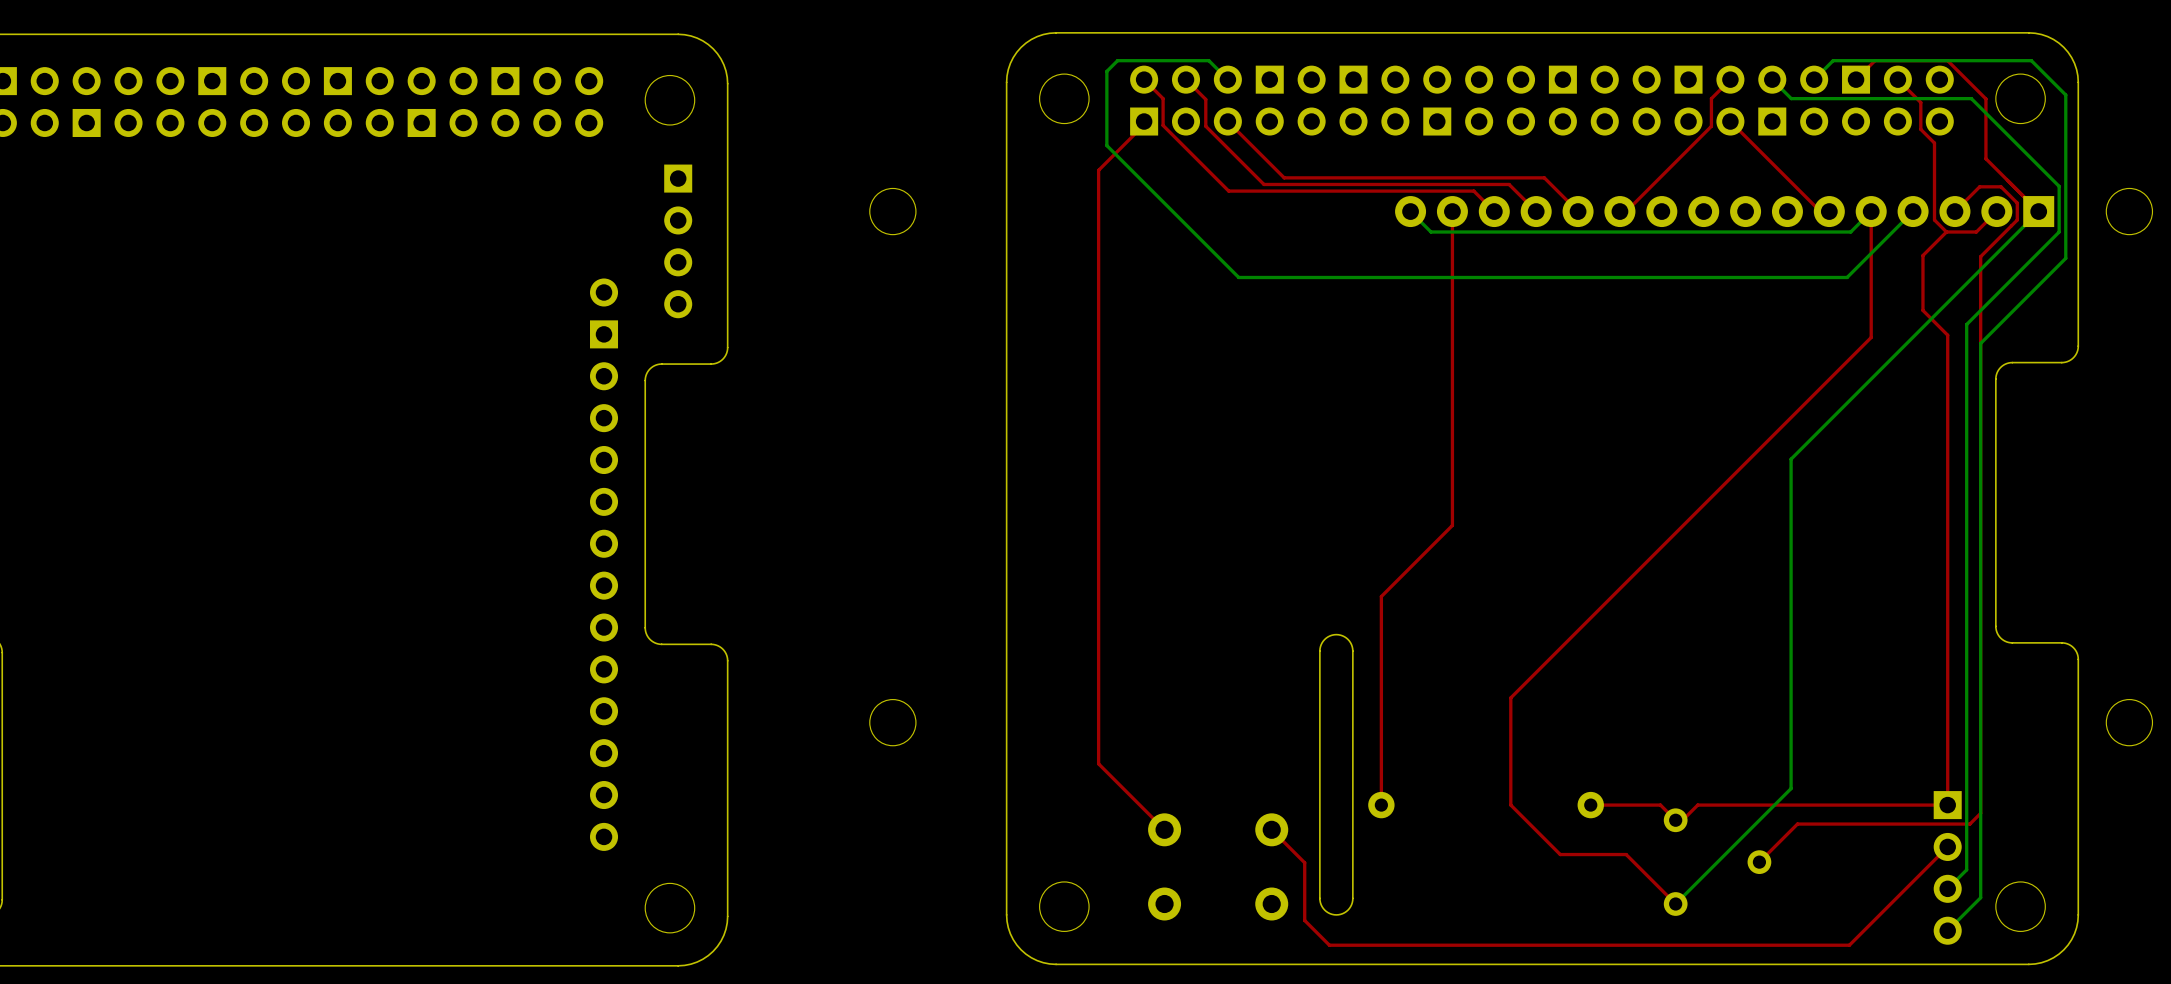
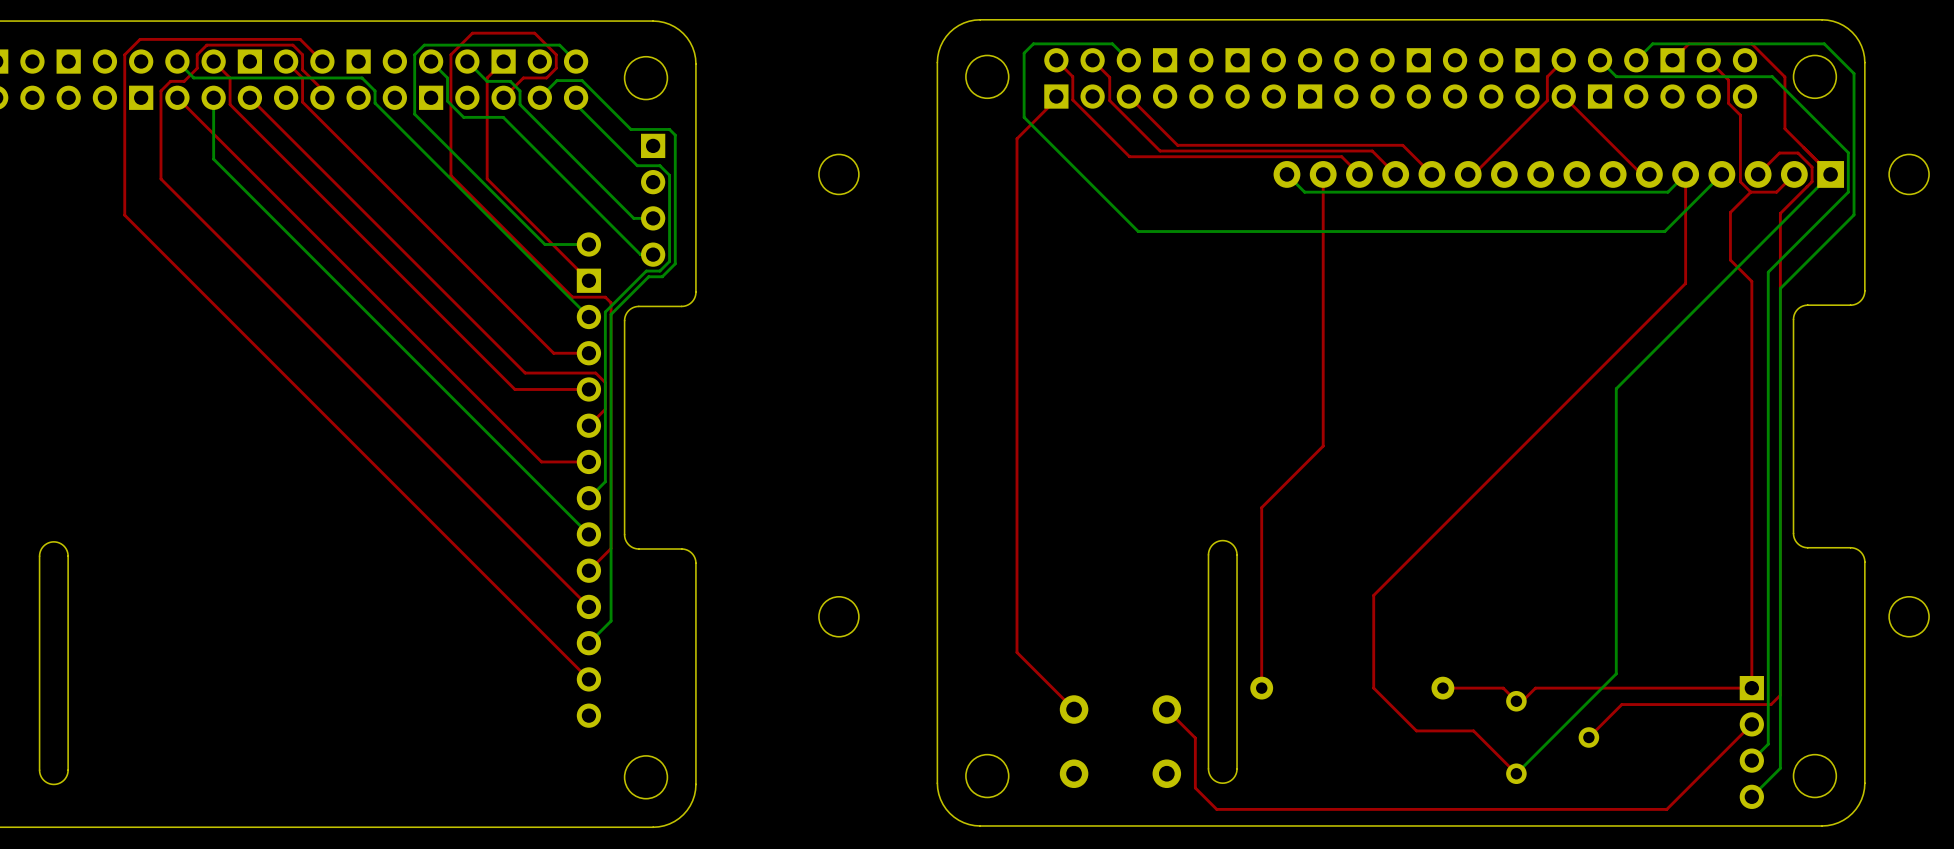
bottom track: none -> (177, 61) (193, 77) (362, 77) (375, 90) (375, 103) (588, 316)
top track: none -> (213, 61) (230, 77) (230, 104) (514, 389) (588, 389)
top track: none -> (286, 61) (302, 77) (302, 102) (553, 353) (588, 353)
top track: none -> (322, 61) (300, 39) (140, 39) (124, 54) (124, 215) (588, 679)
bottom track: none -> (431, 61) (447, 77) (447, 101) (463, 117) (503, 117) (640, 254) (653, 254)
bottom track: none -> (467, 61) (487, 81) (510, 81) (520, 90) (520, 104) (633, 218) (653, 218)
top track: none -> (503, 61) (487, 77) (487, 178) (588, 280)
bottom track: none -> (576, 61) (559, 45) (424, 45) (414, 54) (414, 114) (544, 244) (588, 244)
top track: none -> (177, 97) (541, 461) (588, 461)
bottom track: none -> (213, 97) (213, 159) (588, 534)
top track: none -> (249, 97) (525, 373) (595, 373) (605, 382) (605, 409) (588, 425)
top track: none -> (322, 97) (322, 89) (302, 69) (302, 54) (292, 45) (206, 45) (197, 54) (197, 68) (184, 81) (170, 81) (160, 90) (160, 178) (588, 606)
top track: none -> (503, 97) (523, 77) (546, 77) (556, 68) (556, 54) (534, 33) (472, 33) (450, 54) (450, 175) (572, 297) (605, 297) (611, 302) (611, 548) (588, 570)
bottom track: none -> (539, 97) (557, 80) (582, 80) (631, 129) (669, 129) (675, 135) (675, 263) (662, 276) (648, 276) (611, 314) (611, 621) (588, 643)
bottom track: none -> (576, 97) (576, 104) (637, 165) (659, 165) (669, 175) (669, 261) (659, 271) (646, 271) (605, 312) (605, 481) (588, 498)

